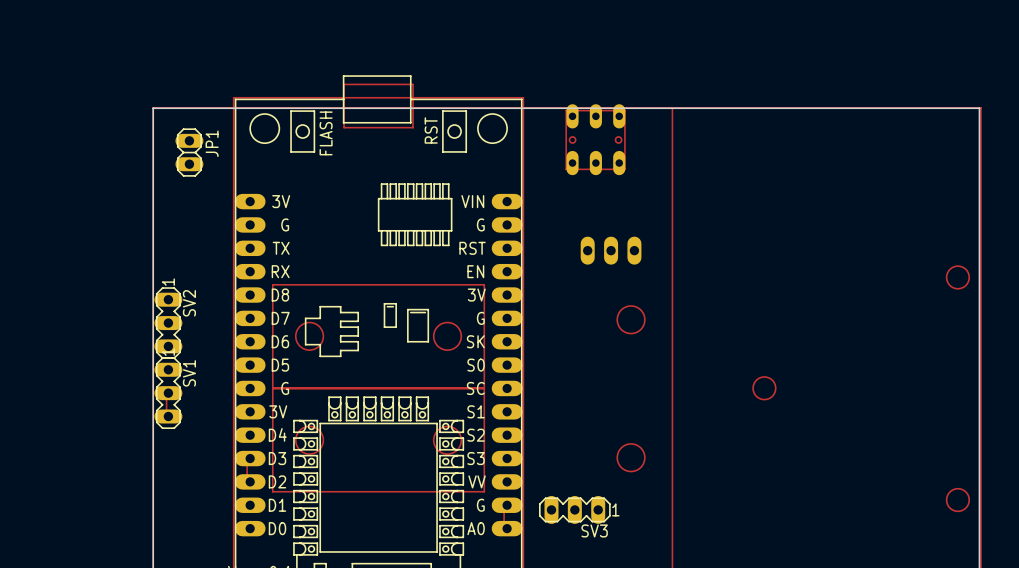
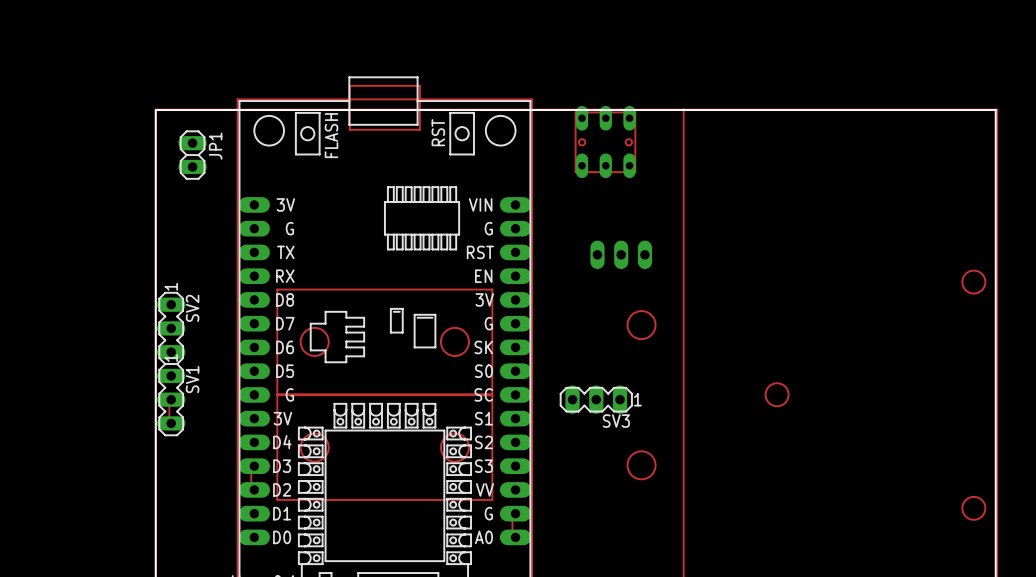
SV3 position: (574, 509) -> (596, 399)

